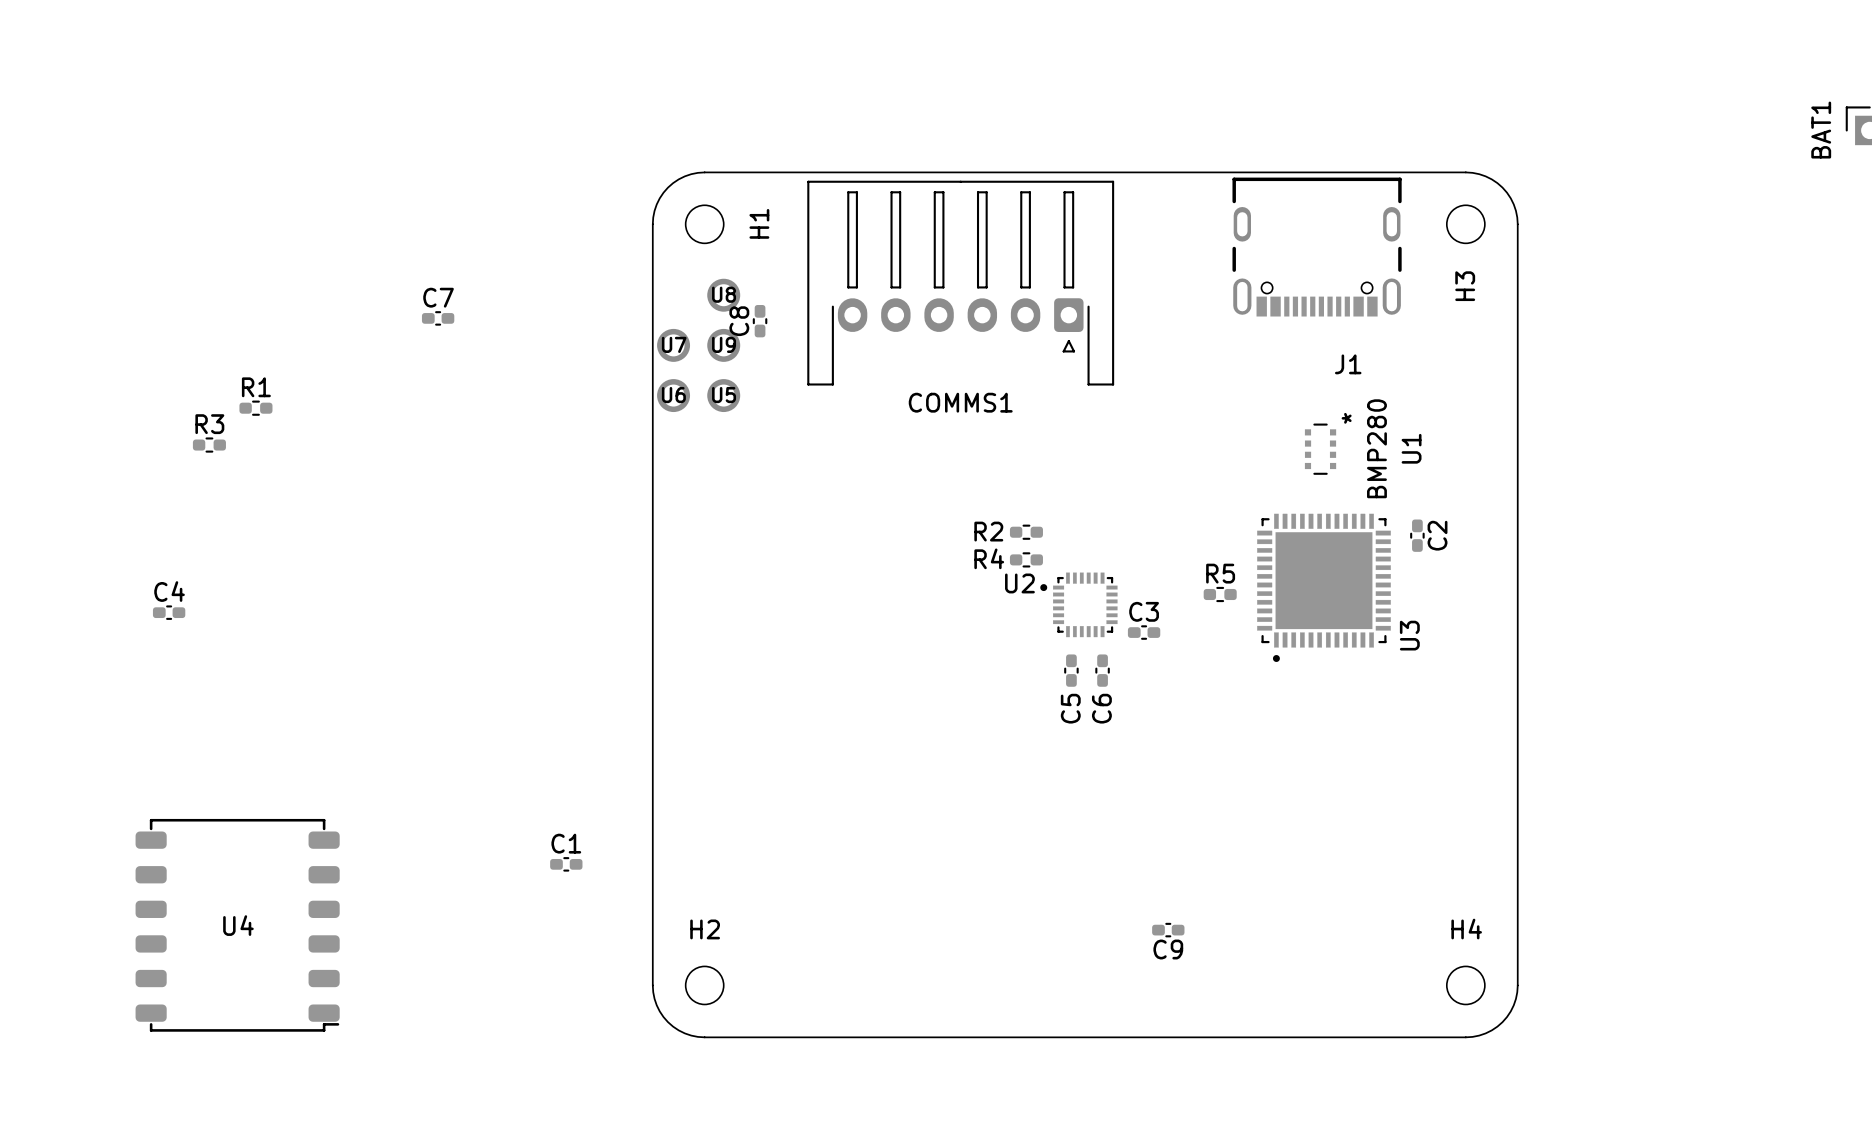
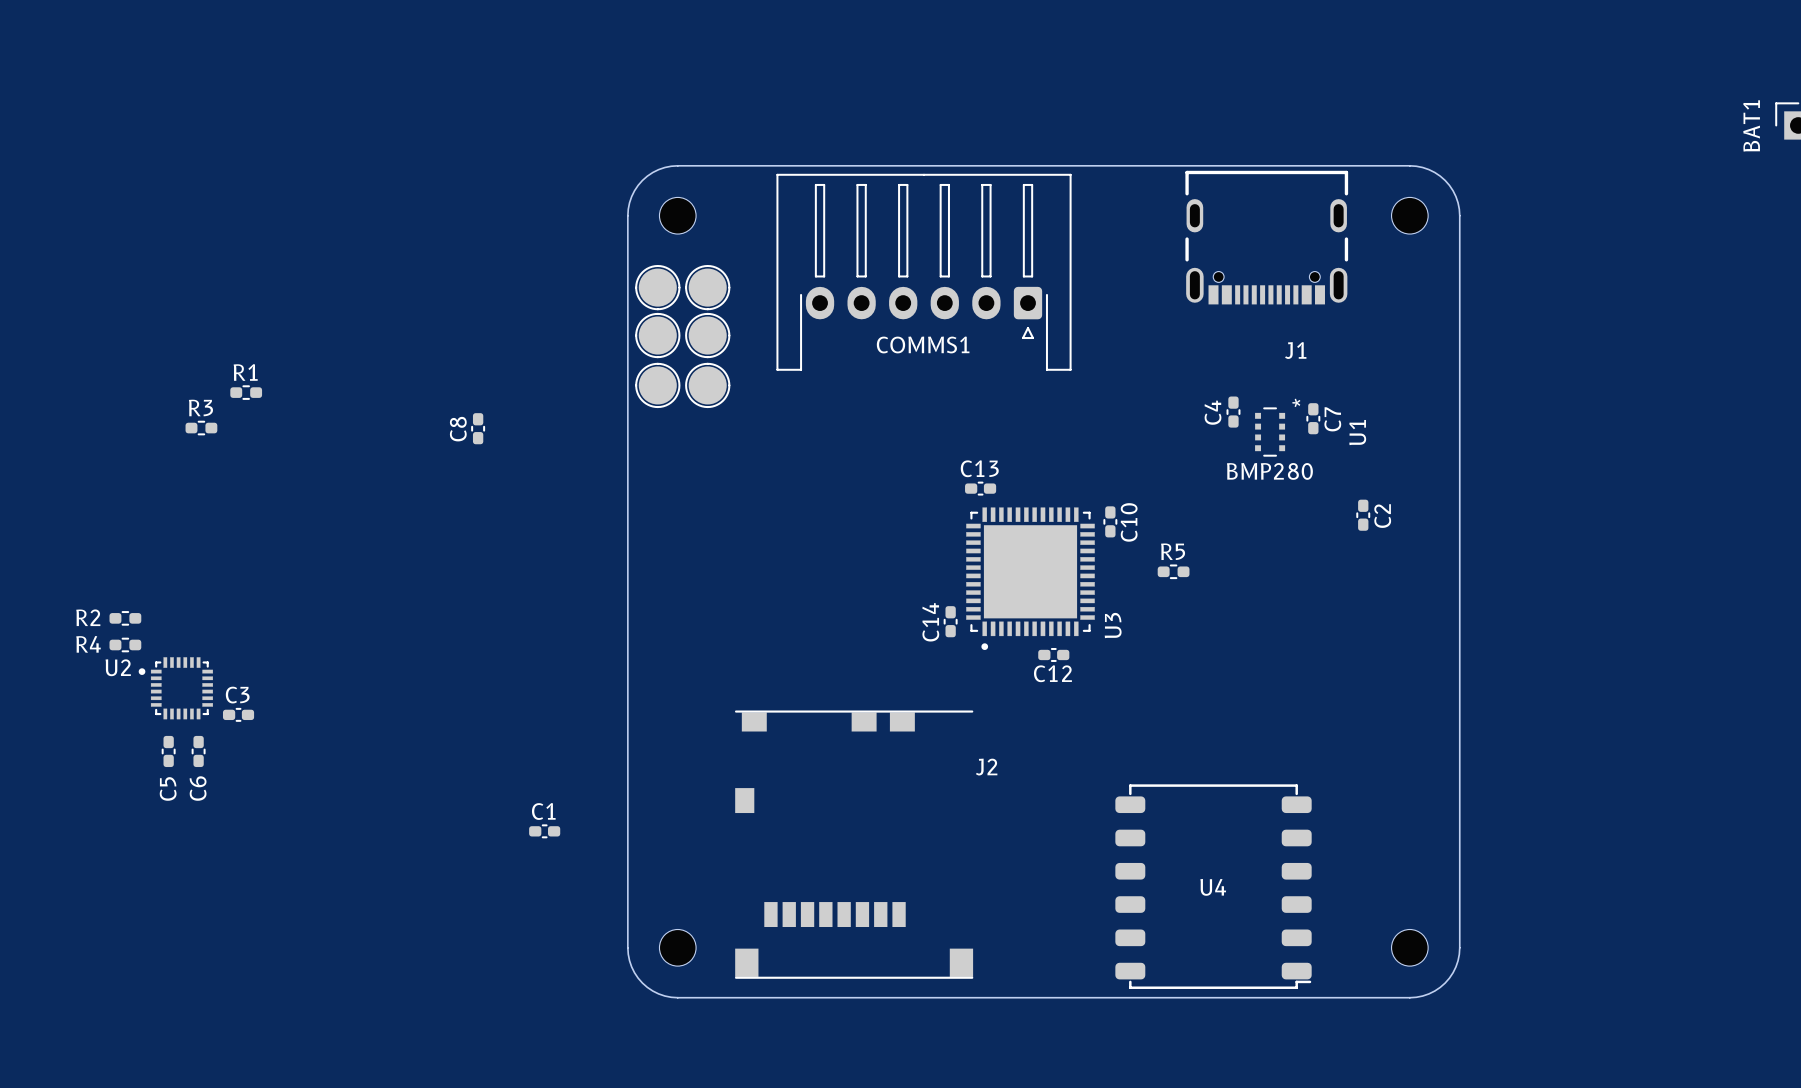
H1 name: H1 (759, 223) -> none
H3 name: H3 (1465, 286) -> none
U8: (723, 295) -> none
part: none -> (657, 287)
part: none -> (707, 287)
C7 rotation: 0° (438, 318) -> 90° clockwise (1313, 418)
C7 position: (438, 318) -> (1313, 418)
C8 position: (760, 321) -> (478, 428)
U7: (673, 345) -> none
U9: (723, 345) -> none
part: none -> (657, 335)
part: none -> (707, 335)
U6: (673, 395) -> none
U5: (723, 395) -> none
part: none -> (657, 385)
part: none -> (707, 385)
COMMS1 name position: COMMS1 (960, 402) -> COMMS1 (923, 344)
U1 value rotation: 0° (1376, 448) -> 90° clockwise (1269, 471)
C13: none -> (980, 488)
R2 position: (1026, 532) -> (125, 618)
C10: none -> (1110, 521)
R4 position: (1026, 559) -> (125, 644)
U3 position: (1323, 587) -> (1030, 578)
U2 position: (1078, 604) -> (175, 688)
C4 rotation: 0° (169, 612) -> 90° clockwise (1233, 412)
C4 position: (169, 612) -> (1233, 412)
C3 position: (1144, 632) -> (238, 714)
C14: none -> (950, 621)
C5 position: (1071, 670) -> (168, 751)
C6 position: (1102, 670) -> (198, 751)
C12: none -> (1053, 654)
J2: none -> (854, 844)
U4 position: (237, 925) -> (1213, 886)
H2 name: H2 (705, 929) -> none
H4 name: H4 (1466, 929) -> none
C9: (1168, 930) -> none

